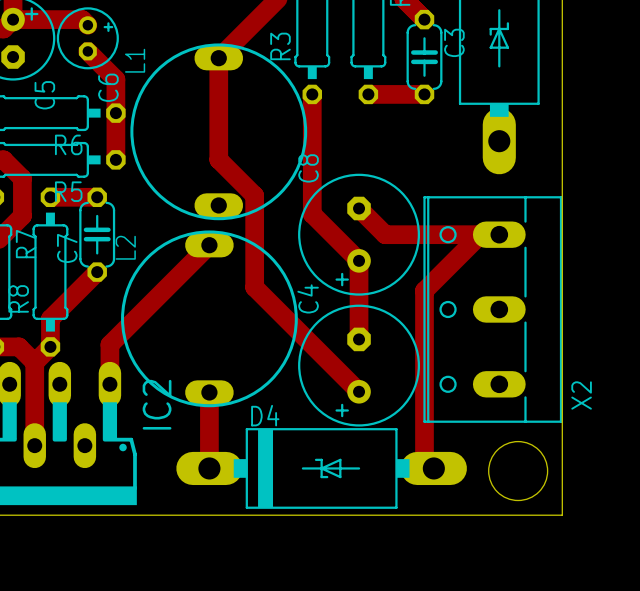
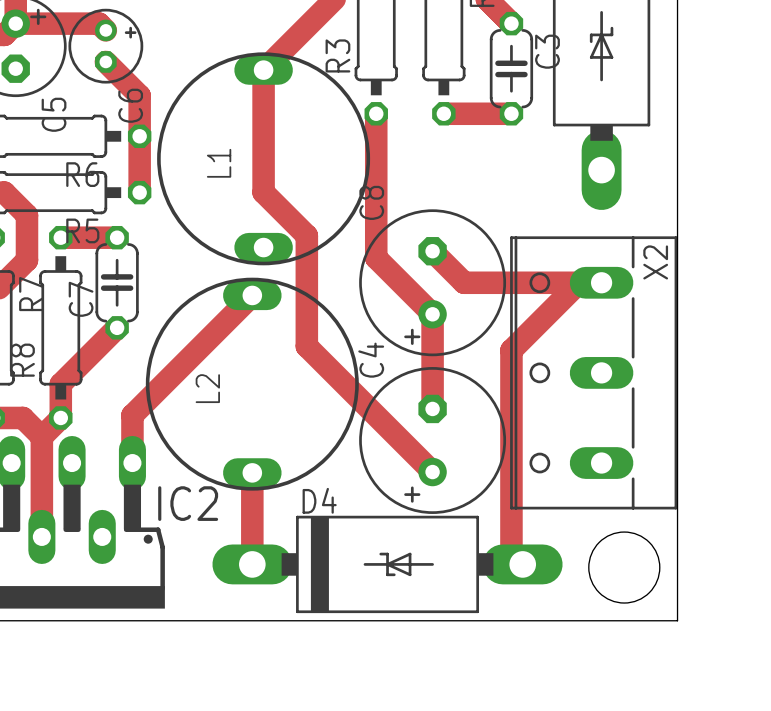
L1 name position: L1 (135, 60) -> L1 (219, 163)
L2 name position: L2 (125, 247) -> L2 (207, 388)
X2 name position: X2 (581, 395) -> X2 (655, 262)
IC2 name rotation: 0° (157, 404) -> 90° clockwise (188, 503)

